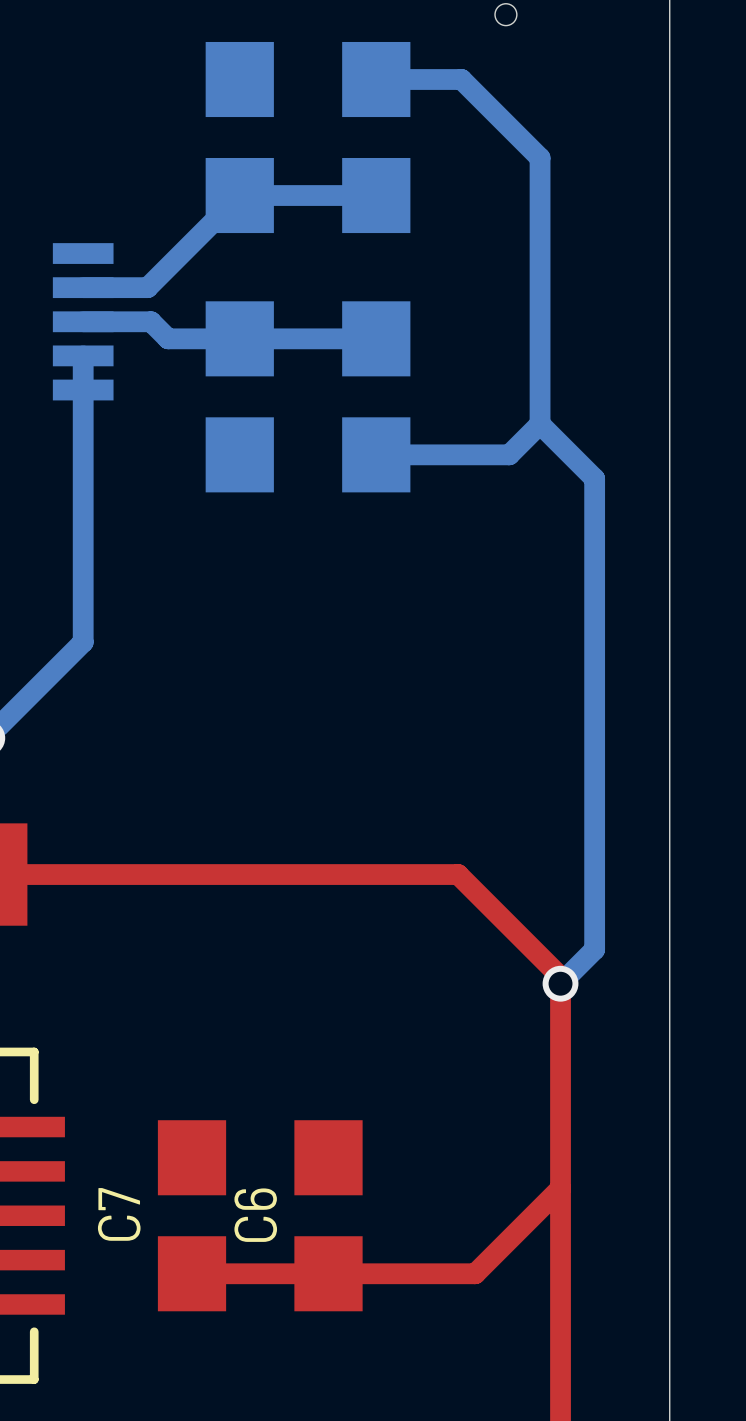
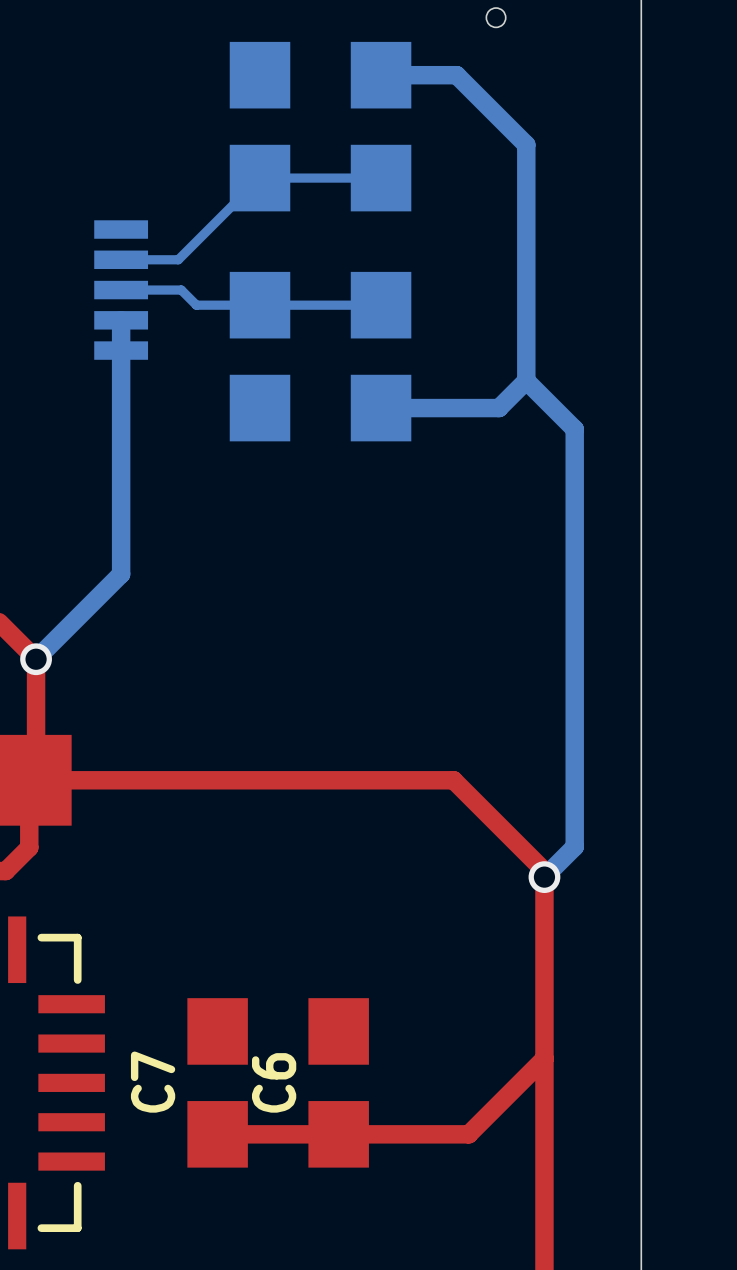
bottom track width: thick (376, 195) (239, 195) (147, 287) (83, 287) -> thin (381, 178) (260, 178) (178, 259) (121, 259)
bottom track width: thick (83, 321) (151, 321) (168, 338) (376, 338) -> thin (121, 290) (181, 290) (196, 305) (381, 305)

